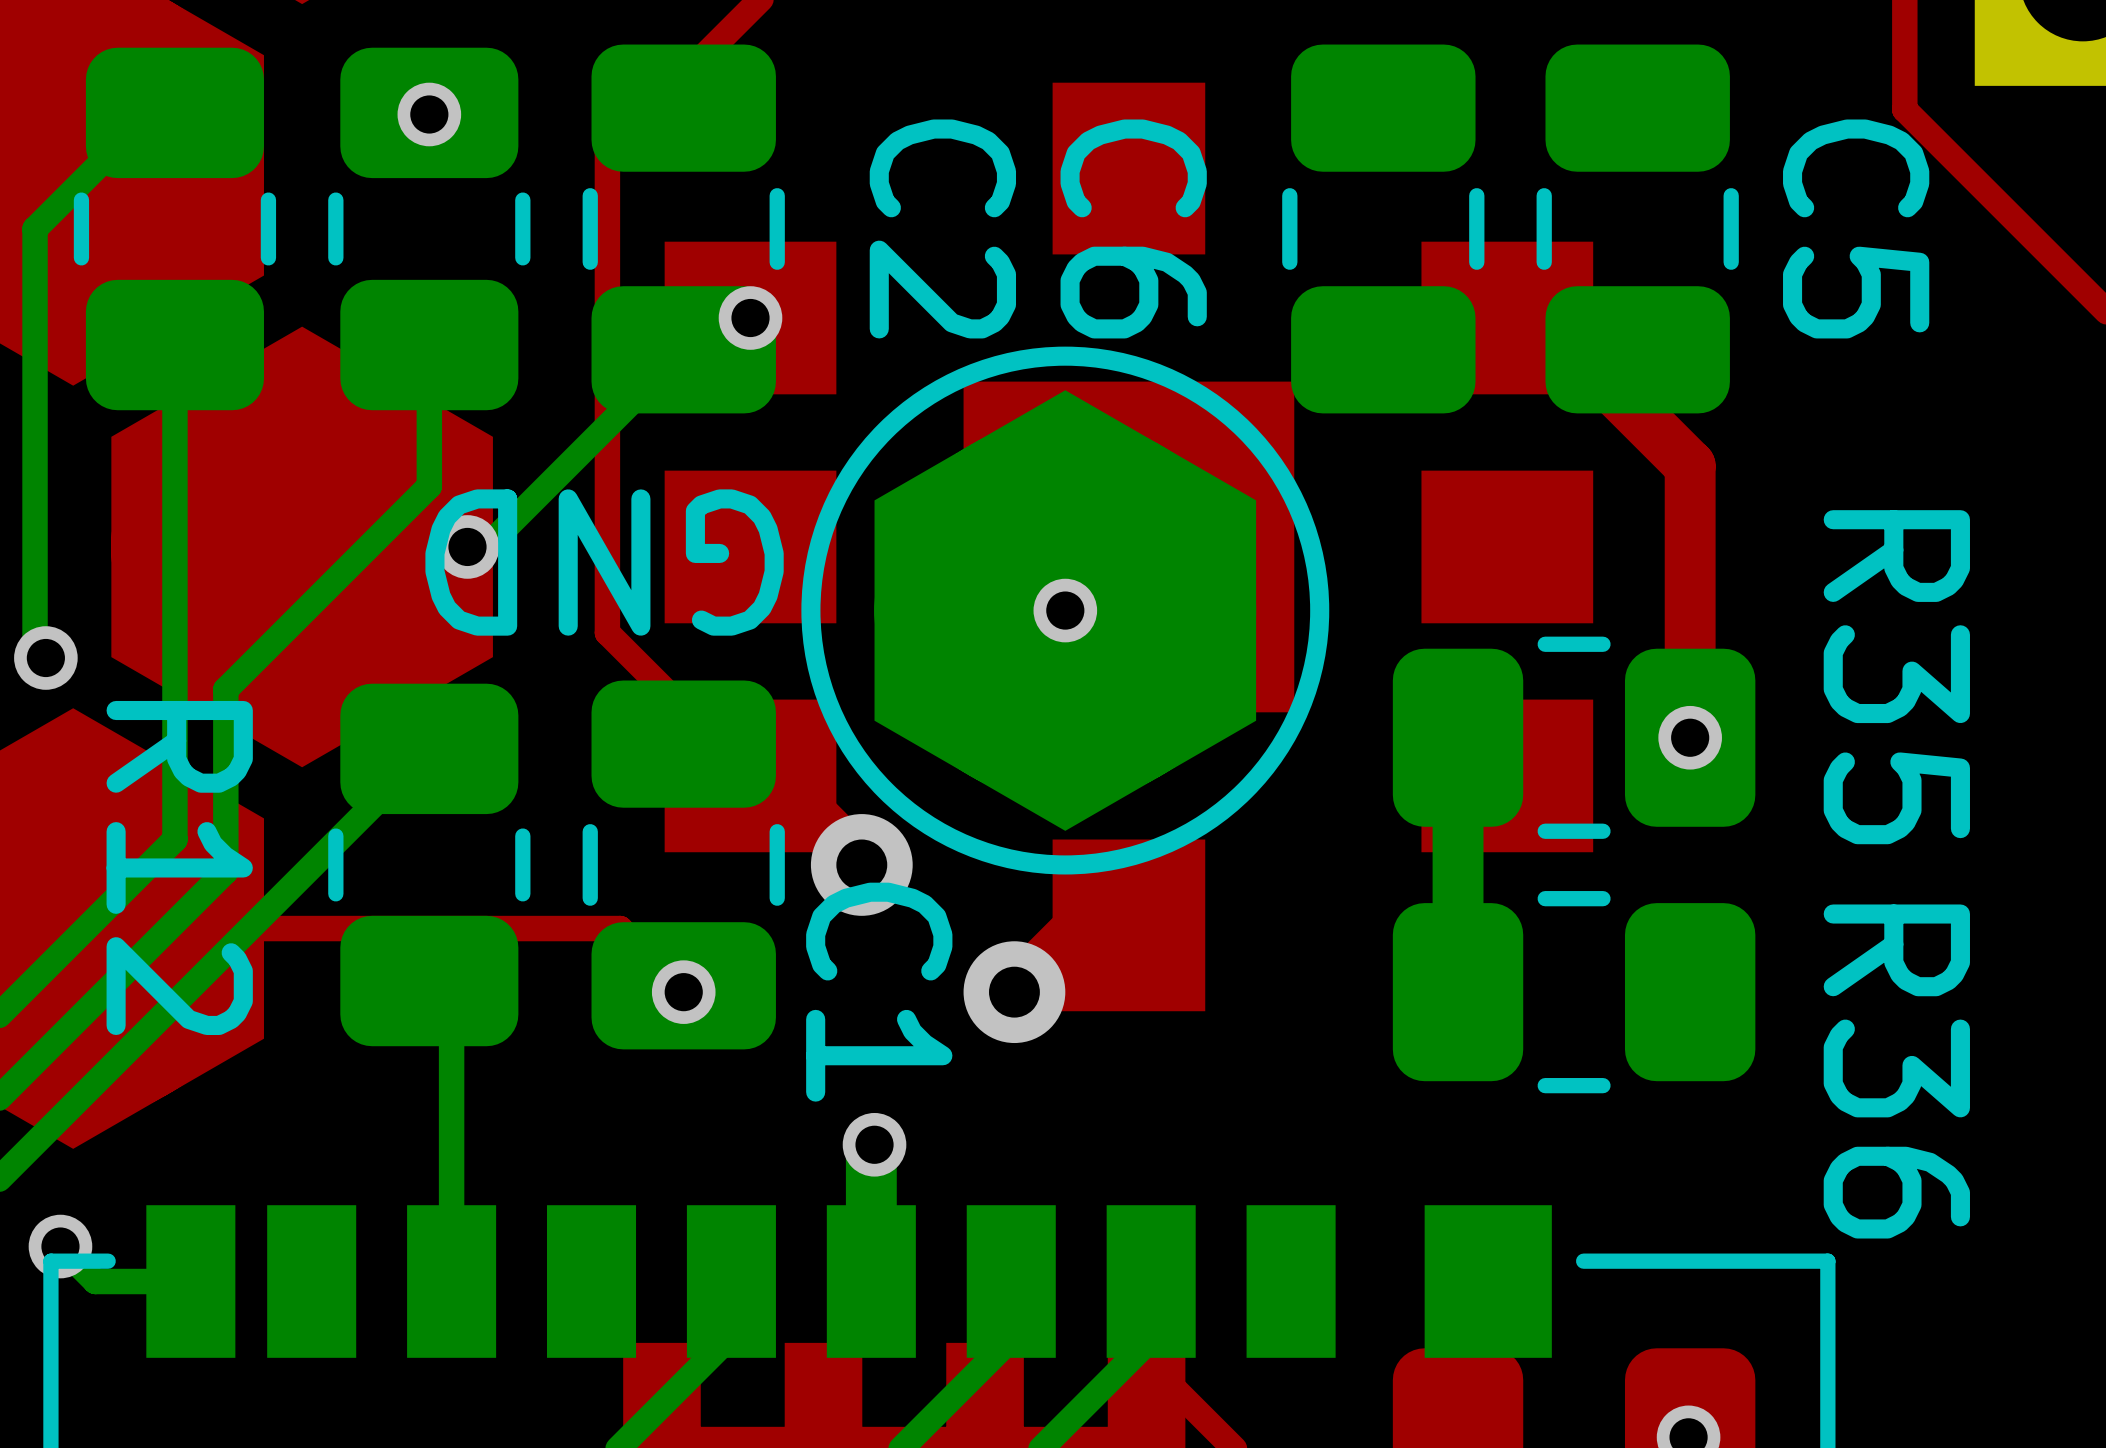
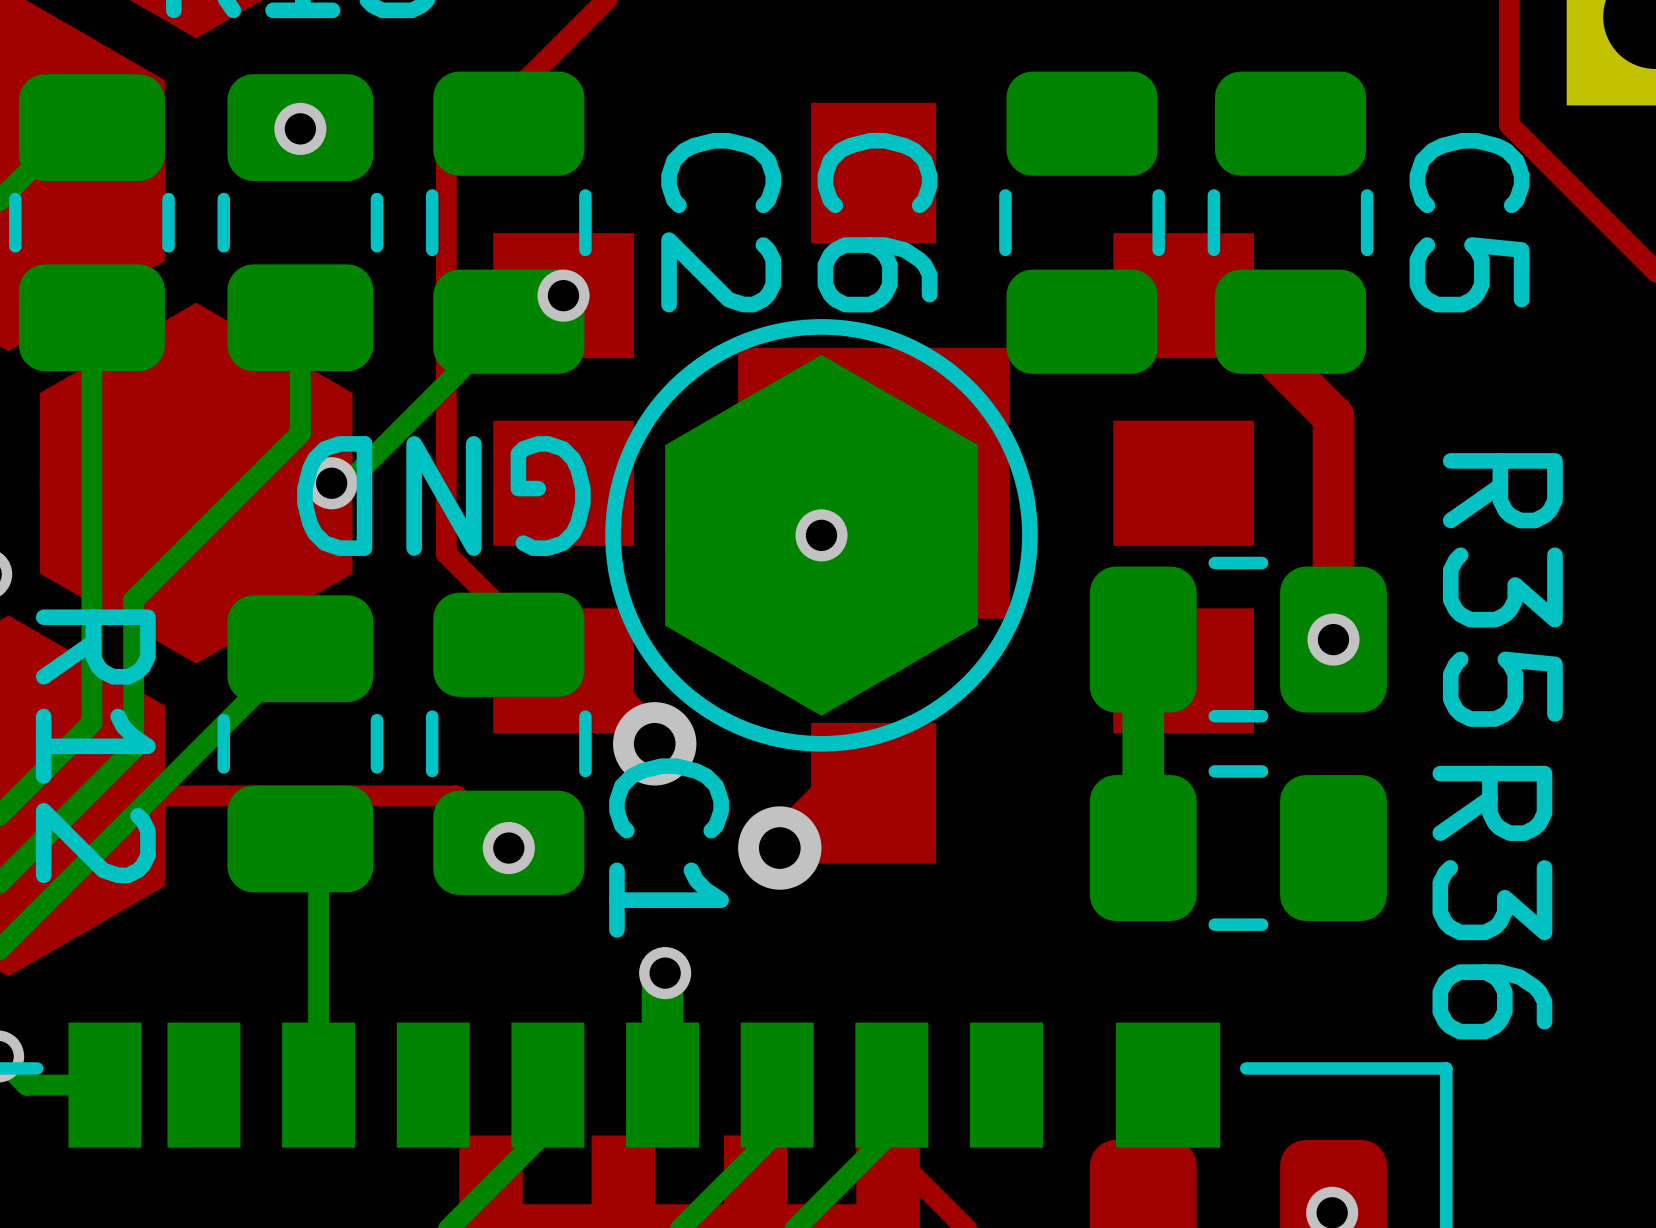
R36 name position: R36 (1896, 1071) -> R36 (1492, 902)

